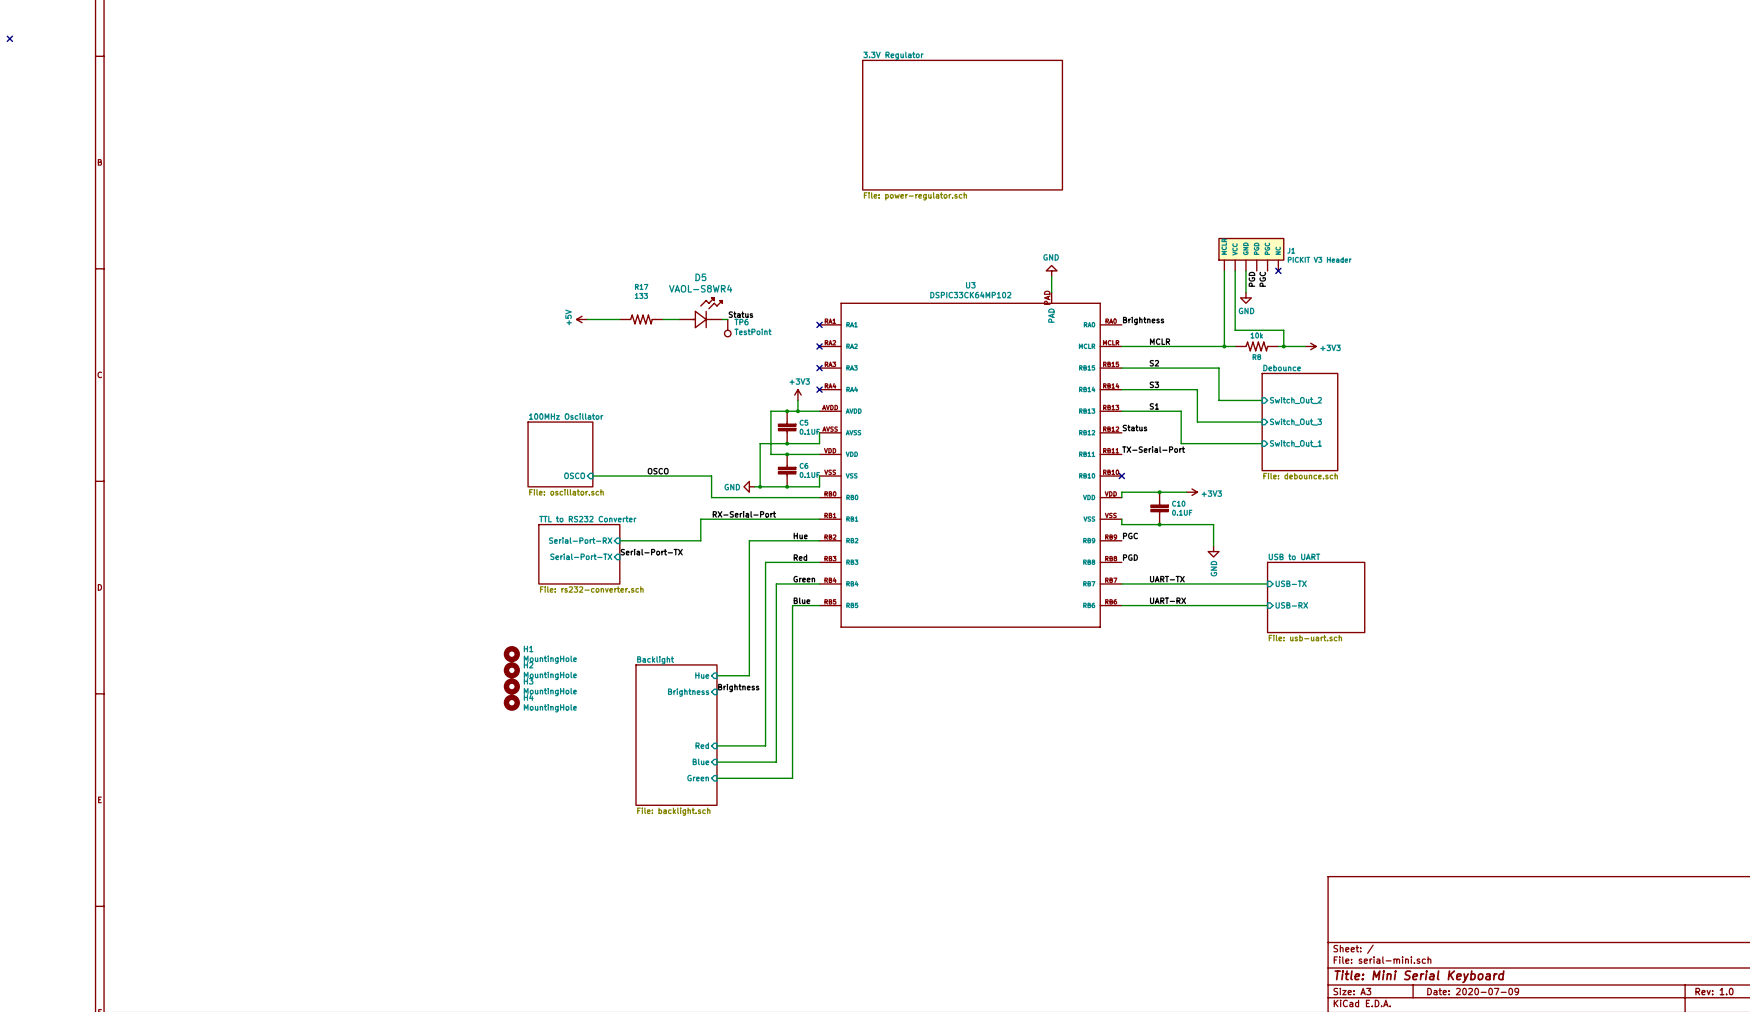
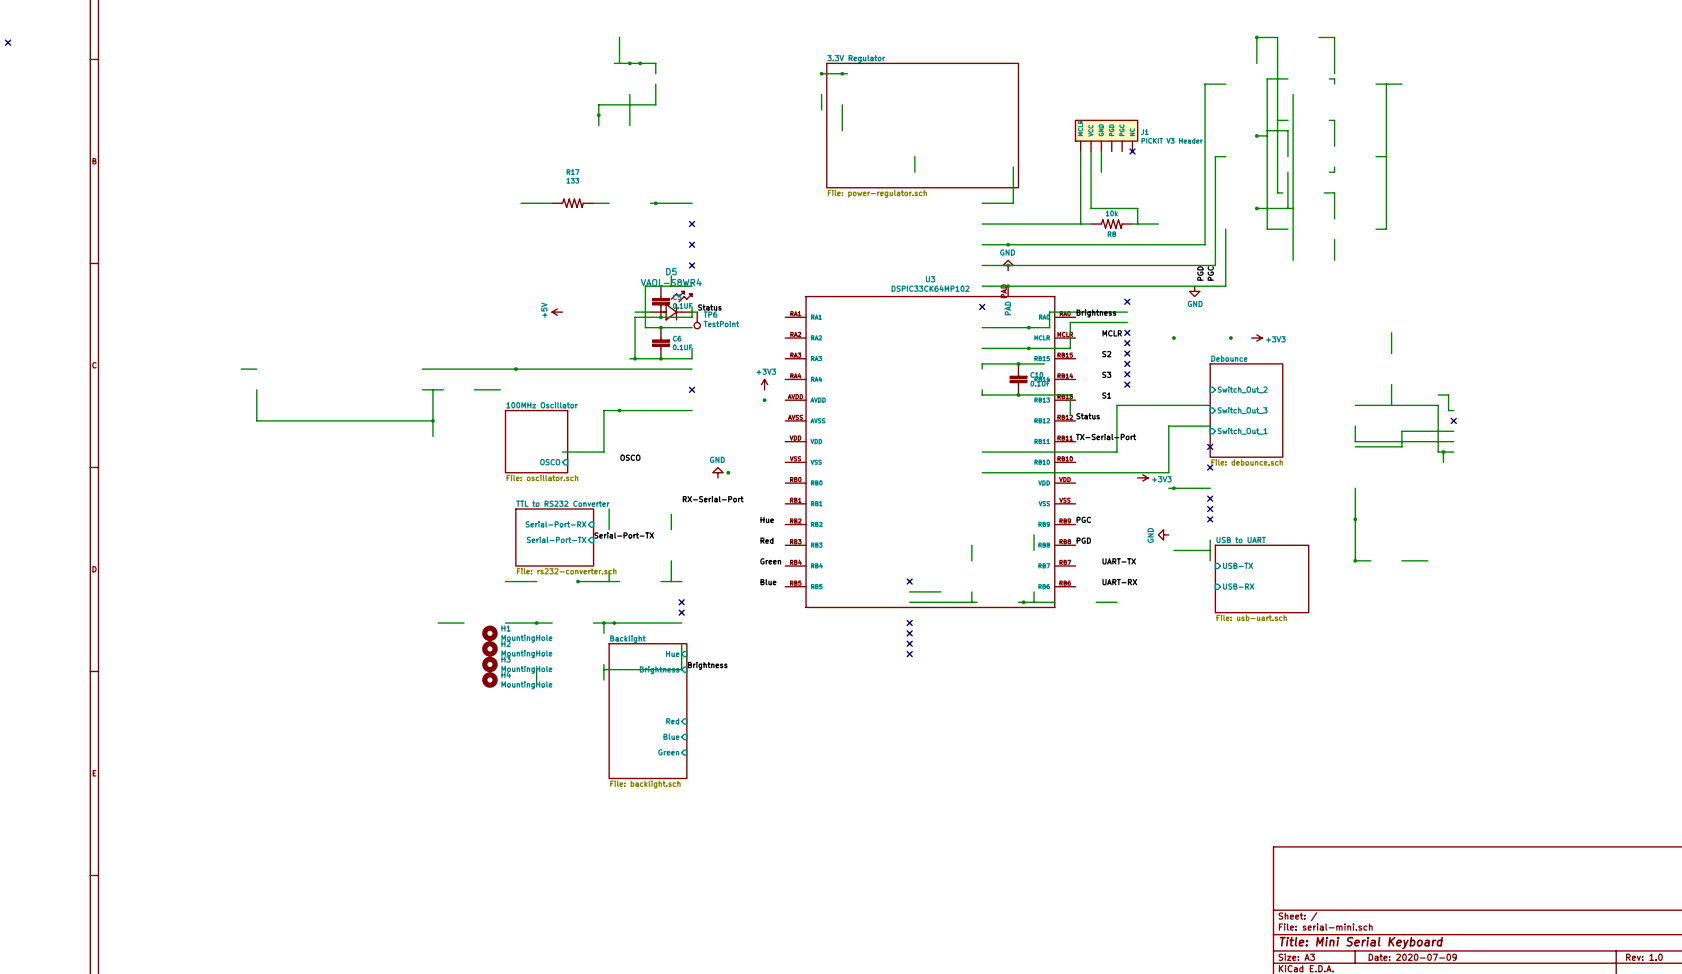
wire: none -> (619, 37) (619, 63)
junction: none -> (1256, 37)
wire: none -> (1319, 37) (1334, 37) (1334, 73)
wire: none -> (614, 63) (655, 63) (655, 73)
junction: none -> (629, 63)
junction: none -> (640, 63)
wire: none -> (1256, 63) (1256, 37) (1277, 37) (1277, 192) (1282, 192)
wire: none -> (821, 73) (847, 73)
junction: none -> (821, 73)
junction: none -> (842, 73)
wire: none -> (1287, 78) (1267, 78) (1267, 229) (1287, 229)
wire: none -> (1329, 78) (1334, 78) (1334, 84)
wire: none -> (655, 84) (655, 104) (598, 104) (598, 125)
wire: none -> (1225, 84) (1205, 84) (1205, 244) (982, 244)
wire: none -> (1376, 84) (1401, 84)
wire: none -> (1386, 84) (1386, 229) (1376, 229)
wire: none -> (629, 94) (629, 125)
wire: none -> (821, 94) (821, 110)
wire: none -> (1293, 94) (1293, 260)
wire: none -> (842, 104) (842, 130)
junction: none -> (598, 115)
wire: none -> (1277, 120) (1287, 120)
wire: none -> (1329, 120) (1334, 120) (1334, 146)
wire: none -> (1267, 130) (1287, 130) (1287, 156)
wire: none -> (1256, 135) (1267, 135)
junction: none -> (1256, 135)
wire: none -> (1080, 151) (1080, 224)
wire: none -> (1091, 151) (1091, 208) (1137, 208) (1137, 224)
wire: none -> (1101, 151) (1101, 172)
no-connect mark: none -> (1132, 151)
wire: none -> (914, 156) (914, 172)
wire: none -> (1225, 156) (1215, 156) (1215, 265) (982, 265)
wire: none -> (1376, 156) (1386, 156)
wire: none -> (1013, 167) (1013, 203) (982, 203)
wire: none -> (1334, 167) (1334, 172) (1329, 172)
wire: none -> (1287, 172) (1287, 208)
wire: none -> (1324, 192) (1334, 192) (1334, 218)
wire: none -> (521, 203) (552, 203)
wire: none -> (593, 203) (609, 203)
wire: none -> (650, 203) (692, 203)
junction: none -> (655, 203)
wire: none -> (1256, 208) (1293, 208)
junction: none -> (1256, 208)
no-connect mark: none -> (692, 224)
wire: none -> (982, 224) (1091, 224)
wire: none -> (1132, 224) (1158, 224)
wire: none -> (1225, 229) (1225, 286) (982, 286)
wire: none -> (1334, 239) (1334, 260)
no-connect mark: none -> (692, 244)
junction: none -> (1008, 244)
part position: (1251, 254) -> (1106, 135)
no-connect mark: none -> (692, 265)
junction: none -> (1008, 265)
wire: (1224, 270) (1224, 346) -> none
wire: (1235, 270) (1235, 330) (1283, 330) (1283, 346) -> none
wire: (1245, 270) (1245, 292) -> none
no-connect mark: (1278, 270) -> none
wire: (1051, 276) (1051, 292) -> none
wire: none -> (671, 275) (671, 286)
wire: none -> (692, 286) (645, 286) (645, 327) (692, 327)
junction: none -> (1008, 286)
no-connect mark: none -> (1127, 301)
wire: none -> (692, 306) (692, 317) (635, 317) (635, 358)
no-connect mark: none -> (982, 306)
wire: (587, 319) (619, 319) -> none
part position: (641, 319) -> (572, 203)
wire: none -> (1127, 312) (1049, 312) (1049, 327) (982, 327)
junction: none -> (660, 317)
no-connect mark: (819, 324) -> none
wire: none -> (1127, 322) (1070, 322) (1070, 348) (982, 348)
junction: none -> (660, 327)
junction: none -> (1028, 327)
no-connect mark: none -> (1127, 332)
wire: none -> (1391, 332) (1391, 353)
no-connect mark: (819, 346) -> none
wire: (1121, 346) (1235, 346) -> none
part position: (1256, 346) -> (1111, 224)
wire: (1278, 346) (1305, 346) -> none
no-connect mark: none -> (1127, 343)
wire: none -> (692, 348) (692, 358) (629, 358)
junction: none -> (1028, 348)
no-connect mark: none -> (1127, 353)
junction: none -> (635, 358)
junction: none -> (660, 358)
no-connect mark: (819, 368) -> none
wire: (1121, 368) (1218, 368) (1218, 400) (1262, 400) -> none
junction: none -> (1018, 363)
wire: none -> (1044, 363) (982, 363) (982, 369)
no-connect mark: none -> (1127, 363)
wire: none -> (241, 369) (256, 369)
wire: none -> (422, 369) (692, 369)
junction: none -> (515, 369)
no-connect mark: none -> (1127, 374)
no-connect mark: (819, 389) -> none
wire: (1121, 389) (1197, 389) (1197, 422) (1262, 422) -> none
no-connect mark: none -> (1127, 384)
wire: none -> (1391, 384) (1391, 405)
wire: none -> (256, 389) (256, 420) (432, 420)
wire: none -> (422, 389) (443, 389)
wire: none -> (432, 389) (432, 436)
wire: none -> (474, 389) (500, 389)
no-connect mark: none -> (692, 389)
wire: (797, 400) (797, 411) -> none
wire: none -> (982, 389) (982, 395) (1070, 395) (1070, 415)
junction: none -> (1018, 395)
wire: none -> (1438, 395) (1448, 395) (1448, 410) (1453, 410)
junction: (787, 411) -> none
wire: (819, 411) (770, 411) (770, 454) (819, 454) -> none
wire: (1121, 411) (1181, 411) (1181, 443) (1262, 443) -> none
wire: none -> (1210, 405) (1116, 405) (1116, 452) (982, 452)
wire: none -> (1355, 405) (1438, 405) (1438, 452) (1453, 452)
junction: none -> (619, 410)
wire: none -> (692, 410) (603, 410) (603, 452) (562, 452)
part position: (787, 427) -> (660, 301)
junction: none -> (432, 420)
wire: (819, 432) (819, 443) (760, 443) (760, 486) -> none
no-connect mark: none -> (1453, 420)
wire: none -> (1210, 426) (1168, 426) (1168, 472) (982, 472)
wire: none -> (1355, 426) (1355, 441) (1453, 441)
junction: (787, 443) -> none
wire: none -> (1453, 431) (1401, 431) (1401, 446) (1355, 446)
junction: (787, 454) -> none
no-connect mark: none -> (1210, 446)
wire: none -> (1443, 452) (1443, 462)
junction: none -> (1443, 452)
part position: (787, 470) -> (660, 343)
wire: (592, 476) (711, 476) (711, 497) (819, 497) -> none
wire: (819, 476) (819, 486) (754, 486) -> none
no-connect mark: (1121, 476) -> none
no-connect mark: none -> (1210, 467)
power symbol rotation: 0° (749, 486) -> 90° clockwise (717, 472)
junction: (787, 486) -> none
junction: (1159, 492) -> none
wire: (1186, 492) (1121, 492) (1121, 497) -> none
wire: none -> (1168, 488) (1210, 488)
junction: none -> (1173, 488)
wire: none -> (1355, 488) (1355, 560) (1370, 560)
part position: (1159, 508) -> (1018, 379)
no-connect mark: none -> (1210, 498)
wire: (819, 519) (700, 519) (700, 530) -> none
wire: (1121, 519) (1121, 524) (1213, 524) (1213, 546) -> none
wire: none -> (609, 509) (609, 529)
junction: (1159, 524) -> none
no-connect mark: none -> (1210, 509)
no-connect mark: none -> (1210, 519)
junction: none -> (1355, 519)
wire: (619, 540) (700, 540) -> (671, 529) (671, 524)
wire: (819, 540) (749, 540) (749, 675) (716, 675) -> none
wire: none -> (1034, 534) (1034, 550)
power symbol rotation: 0° (1213, 551) -> 90° clockwise (1163, 534)
wire: none -> (1210, 540) (1210, 560)
wire: (819, 562) (765, 562) (765, 745) (716, 745) -> none
wire: none -> (971, 545) (971, 560)
wire: none -> (1173, 550) (1210, 550)
wire: none -> (671, 560) (671, 581)
junction: none -> (1355, 560)
wire: none -> (1401, 560) (1427, 560)
wire: (819, 583) (776, 583) (776, 762) (716, 762) -> none
wire: (1121, 583) (1267, 583) -> none
wire: none -> (609, 571) (609, 581)
wire: none -> (505, 581) (536, 581)
wire: none -> (578, 581) (619, 581)
junction: none -> (578, 581)
wire: none -> (660, 581) (681, 581)
no-connect mark: none -> (909, 581)
wire: (819, 605) (792, 605) (792, 778) (716, 778) -> none
wire: (1121, 605) (1267, 605) -> none
wire: none -> (909, 591) (940, 591)
wire: none -> (971, 591) (971, 602)
wire: none -> (1034, 591) (1034, 602)
no-connect mark: none -> (681, 602)
wire: none -> (909, 602) (977, 602)
wire: none -> (1018, 602) (1054, 602)
junction: none -> (1023, 602)
wire: none -> (1096, 602) (1116, 602)
no-connect mark: none -> (681, 612)
wire: none -> (438, 623) (464, 623)
wire: none -> (505, 623) (552, 623)
junction: none -> (536, 623)
wire: none -> (593, 623) (681, 623)
wire: none -> (603, 623) (603, 633)
junction: none -> (603, 623)
junction: none -> (614, 623)
no-connect mark: none -> (909, 623)
no-connect mark: none -> (909, 633)
wire: none -> (681, 643) (681, 669) (603, 669)
no-connect mark: none -> (909, 643)
no-connect mark: none -> (909, 654)
wire: none -> (603, 664) (603, 680)
wire: none -> (536, 669) (536, 685)

